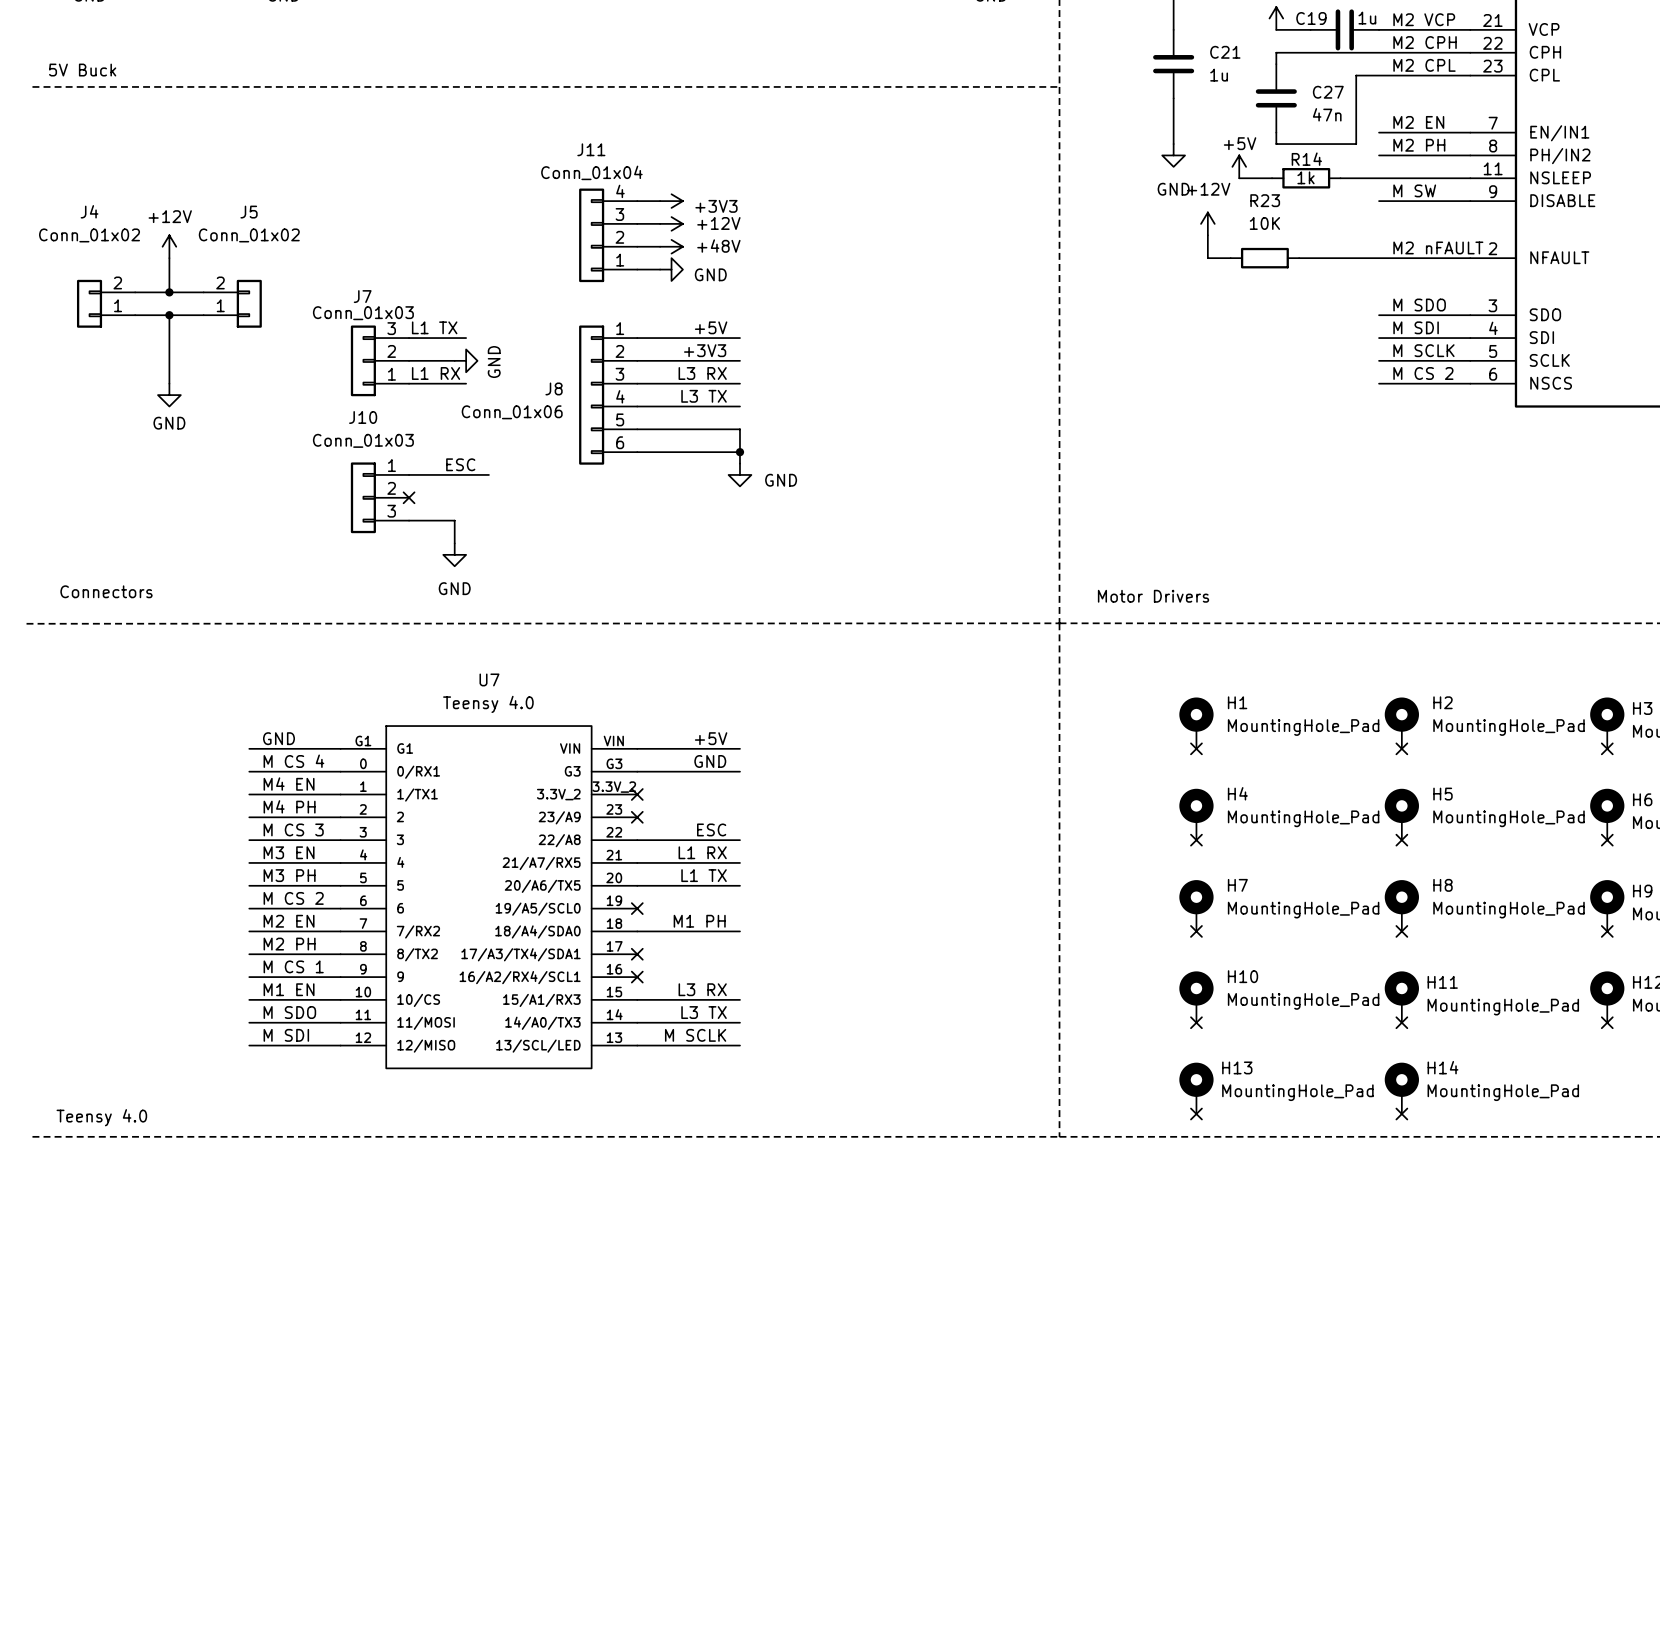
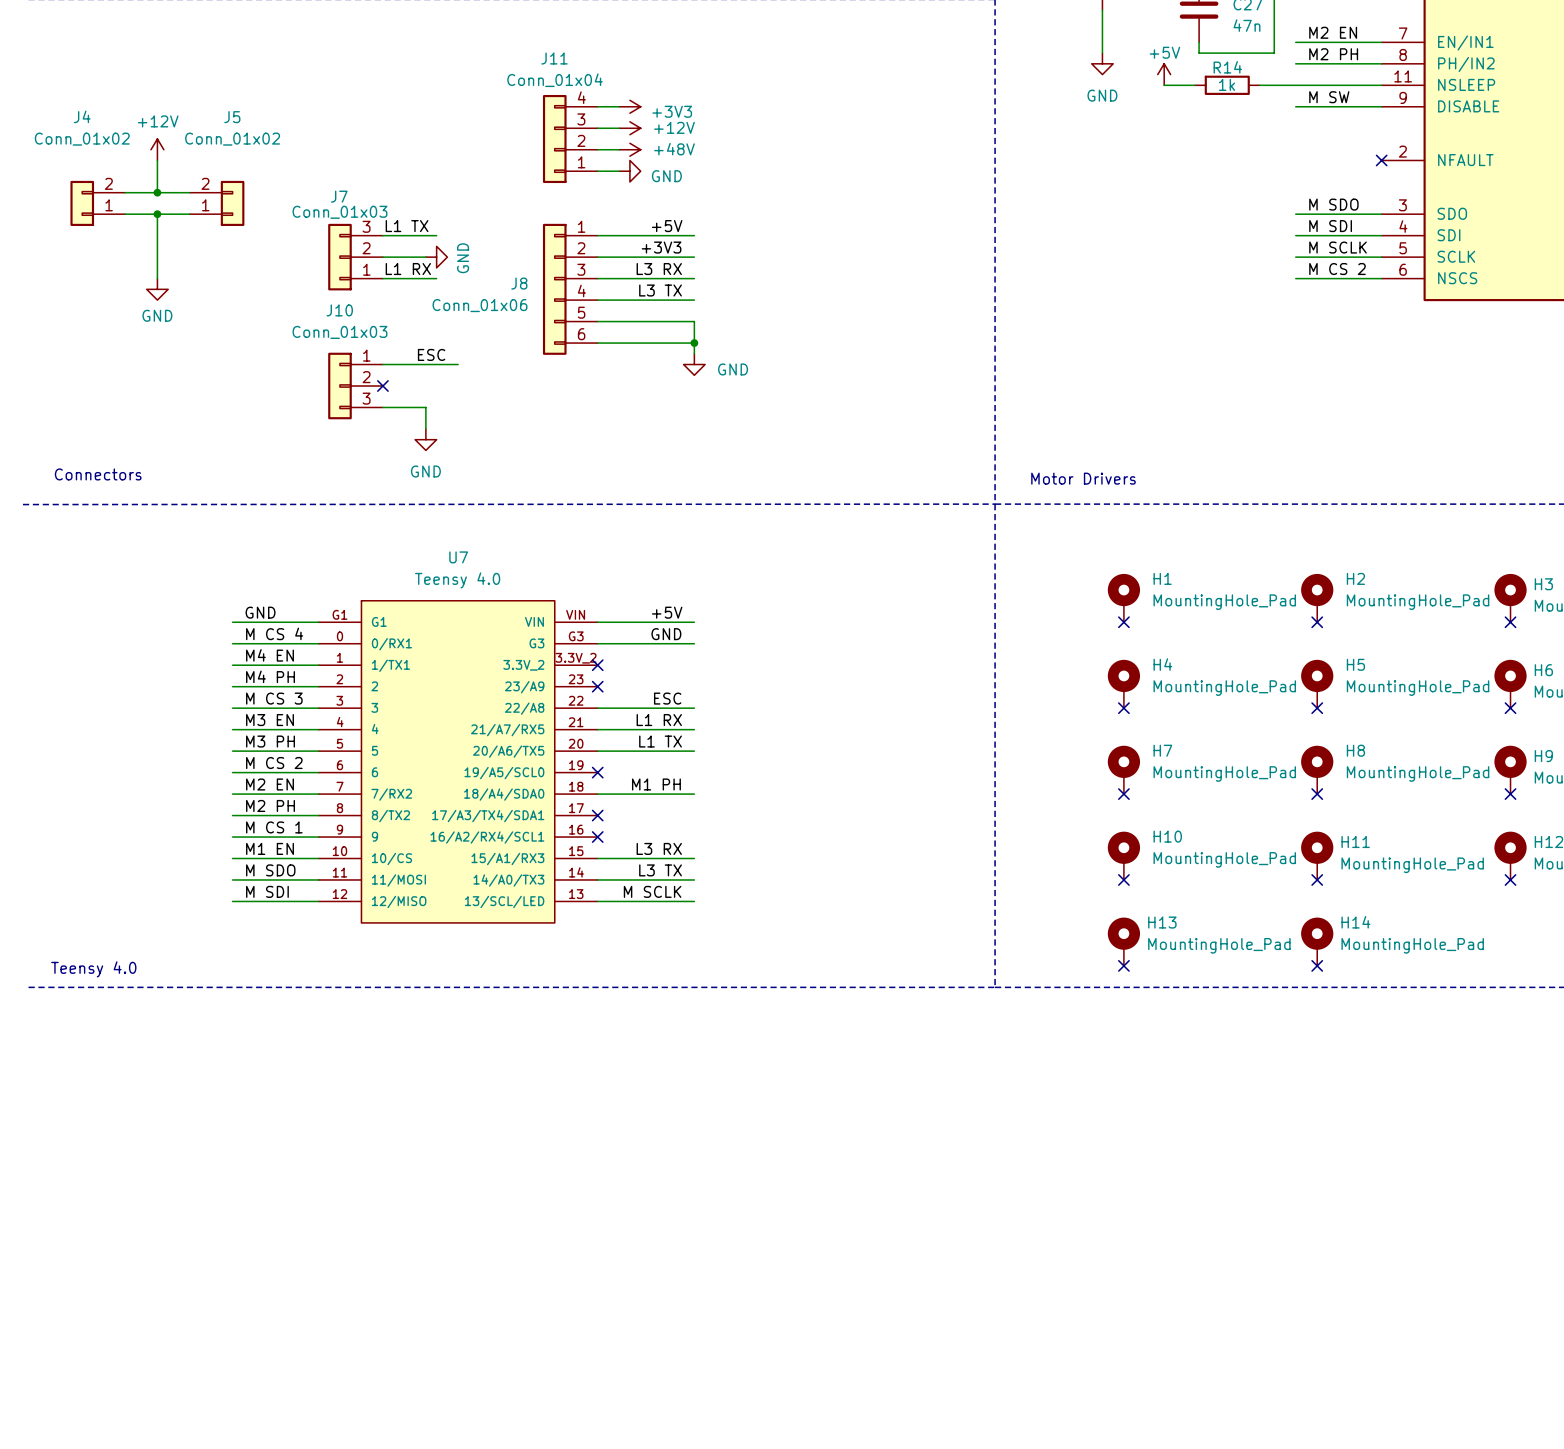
power symbol: +12V (1207, 223) -> none
wire: (1207, 235) (1207, 258) (1230, 258) -> none
label: M2 nFAULT (1438, 247) -> none
R23: 10K (1264, 258) -> none
wire: (1299, 258) (1470, 258) -> none
no-connect mark: none -> (1381, 160)

